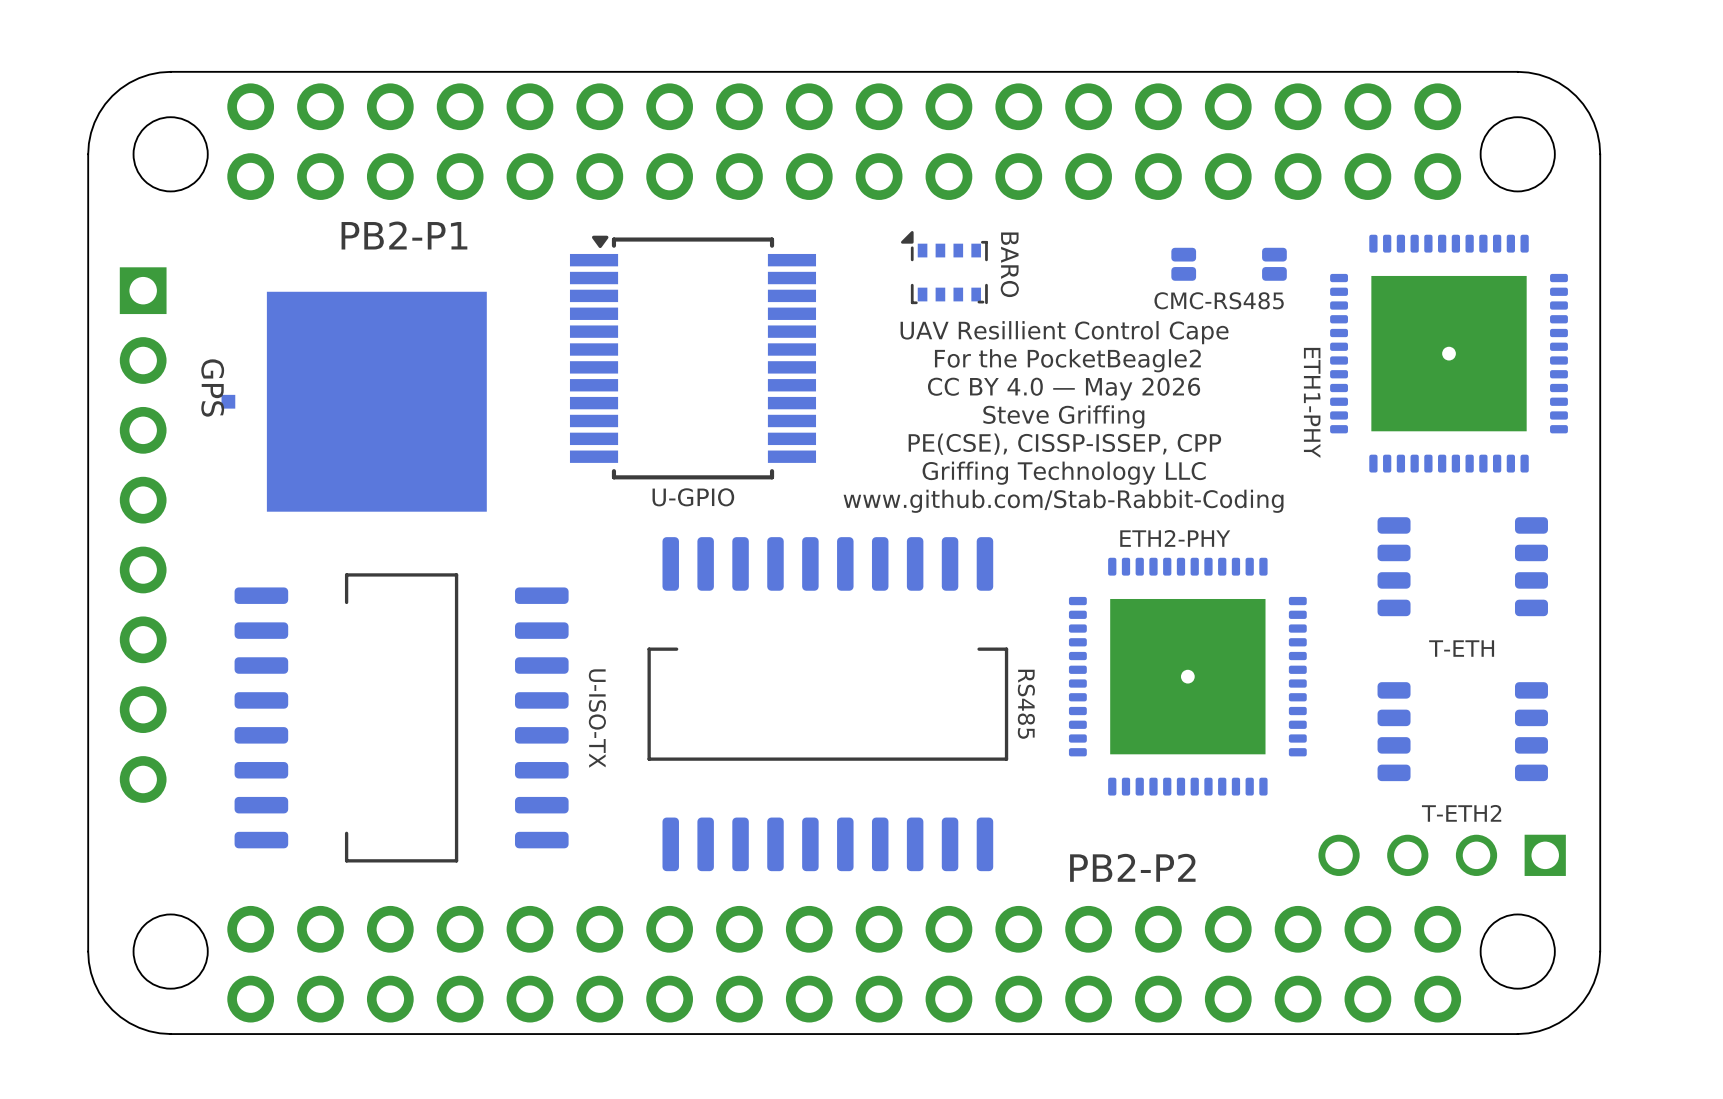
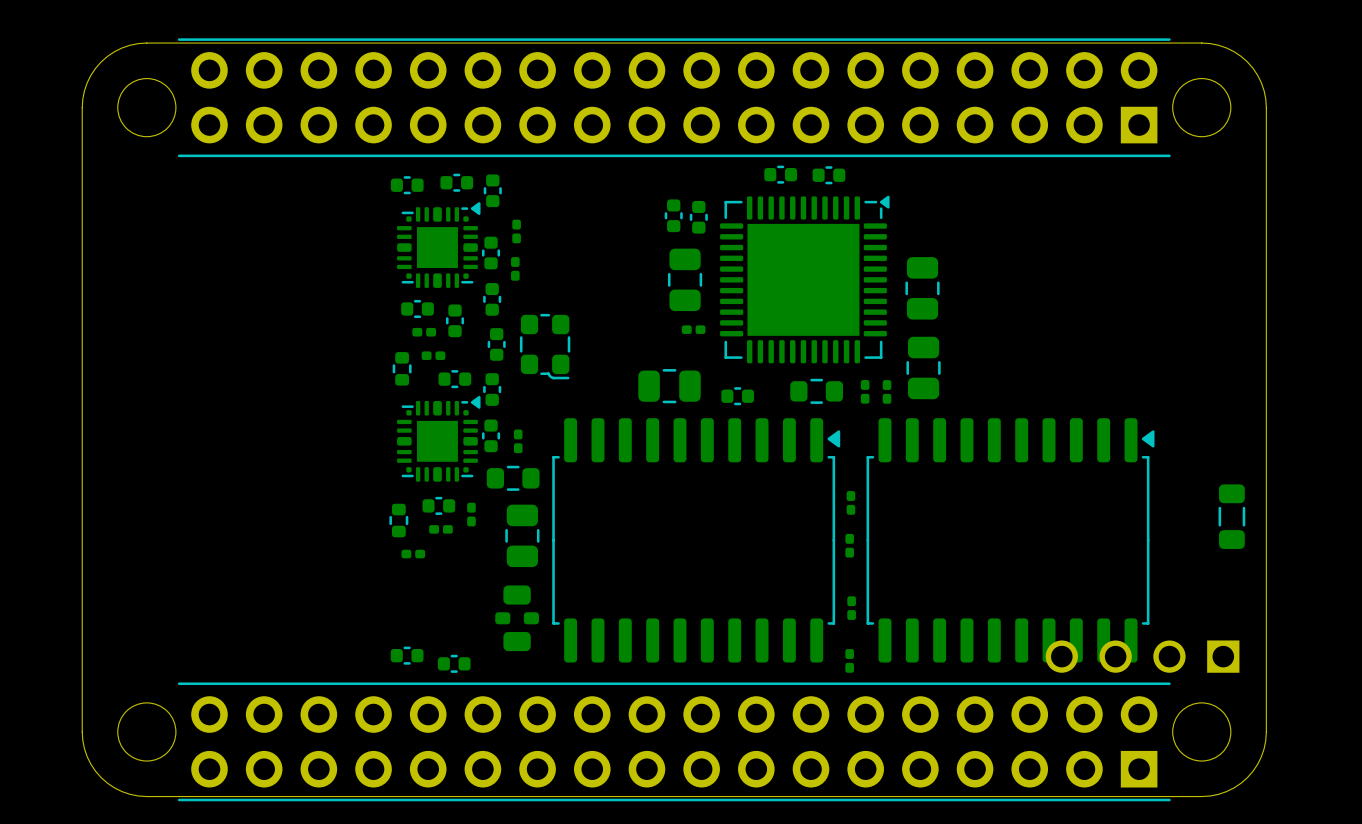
PB2-P1: (844, 141) -> none
part: none -> (674, 97)
part: none -> (780, 174)
part: none -> (828, 175)
part: none -> (456, 182)
part: none -> (407, 185)
part: none -> (492, 190)
CMC-RS485: (1229, 264) -> none
BARO: (944, 267) -> none
part: none -> (673, 215)
part: none -> (698, 217)
part: none -> (516, 231)
part: none -> (438, 245)
text: UAV Resillient Control Cape (1064, 332) -> none
part: none -> (491, 253)
ETH1-PHY: (1449, 353) -> none
U-GPIO: (693, 357) -> none
part: none -> (515, 268)
text: For the PocketBeagle2 (1067, 360) -> none
part: none -> (804, 279)
part: none -> (685, 279)
part: none -> (922, 288)
text: CC BY 4.0 — May 2026 (1064, 389) -> none
part: none -> (492, 299)
GPS: (354, 401) -> none
part: none -> (417, 308)
text: Steve Griffing (1063, 416) -> none
part: none -> (455, 320)
part: none -> (693, 329)
part: none -> (424, 332)
text: PE(CSE), CISSP-ISSEP, CPP (1064, 444) -> none
part: none -> (496, 344)
part: none -> (545, 346)
part: none -> (433, 355)
text: Griffing Technology LLC (1064, 473) -> none
part: none -> (923, 367)
part: none -> (402, 368)
part: none -> (454, 379)
text: www.github.com/Stab-Rabbit-Coding (1063, 501) -> none
part: none -> (669, 386)
part: none -> (492, 389)
part: none -> (816, 391)
part: none -> (865, 391)
part: none -> (887, 391)
part: none -> (737, 396)
part: (143, 535) -> none
T-ETH: (1462, 566) -> none
part: none -> (491, 435)
part: none -> (438, 438)
part: none -> (518, 441)
part: none -> (513, 478)
part: none -> (850, 502)
part: none -> (438, 505)
part: none -> (471, 514)
ETH2-PHY: (1187, 676) -> none
part: none -> (1231, 516)
part: none -> (398, 520)
part: none -> (440, 529)
part: none -> (522, 535)
RS485: (827, 704) -> none
part: none -> (696, 540)
part: none -> (1010, 540)
part: none -> (849, 545)
U-ISO-TX: (401, 717) -> none
part: none -> (413, 554)
T-ETH2: (1462, 731) -> none
part: none -> (851, 608)
part: none -> (517, 618)
part: none -> (407, 655)
part: none -> (849, 660)
part: none -> (454, 663)
PB2-P2: (844, 964) -> none
part: none -> (674, 741)

